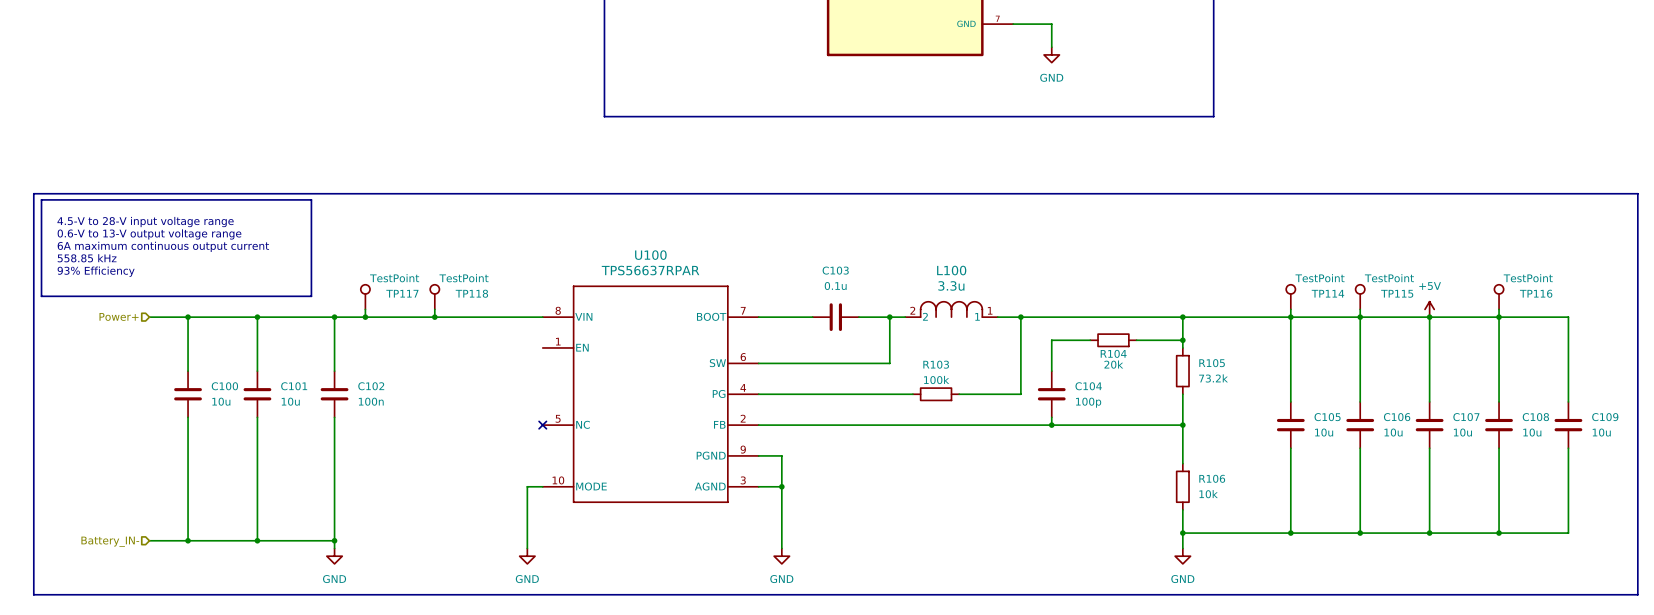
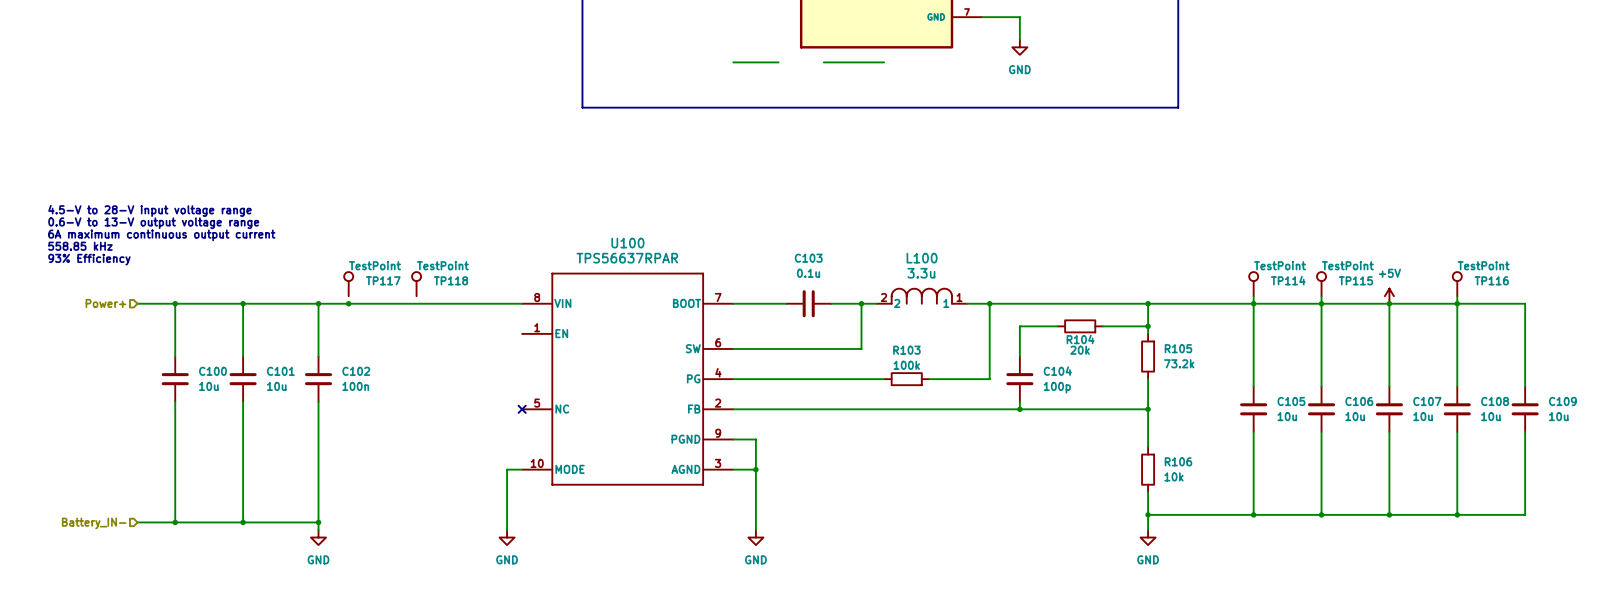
wire: none -> (733, 62) (778, 62)
wire: none -> (823, 62) (884, 62)
line: (33, 193) (1637, 193) (1637, 594) (33, 594) (33, 193) -> none
line: (41, 199) (311, 199) (311, 296) (41, 296) (41, 199) -> none
wire: (365, 309) (365, 317) -> none
wire: (434, 309) (434, 317) -> none
junction: (434, 317) -> none

